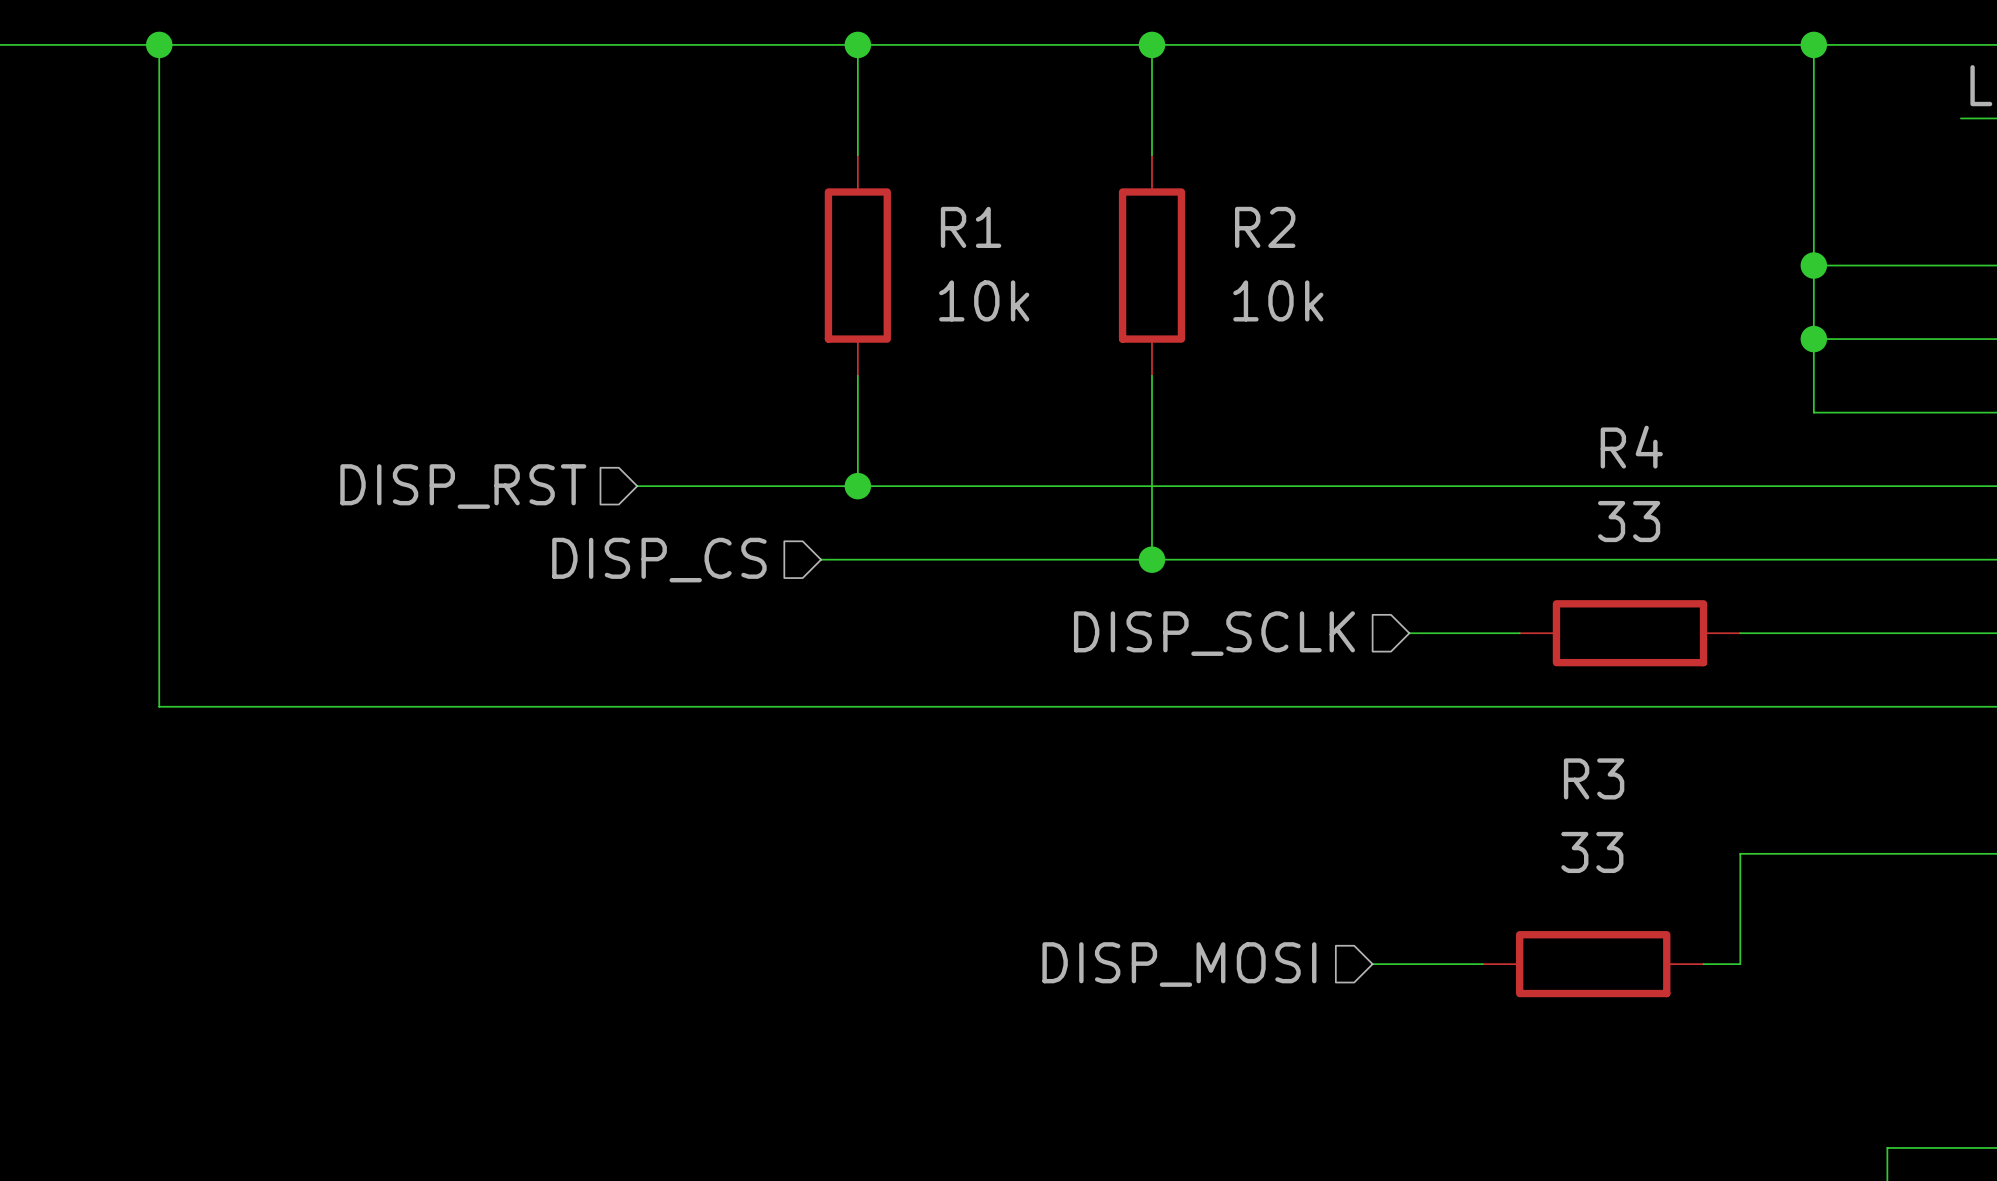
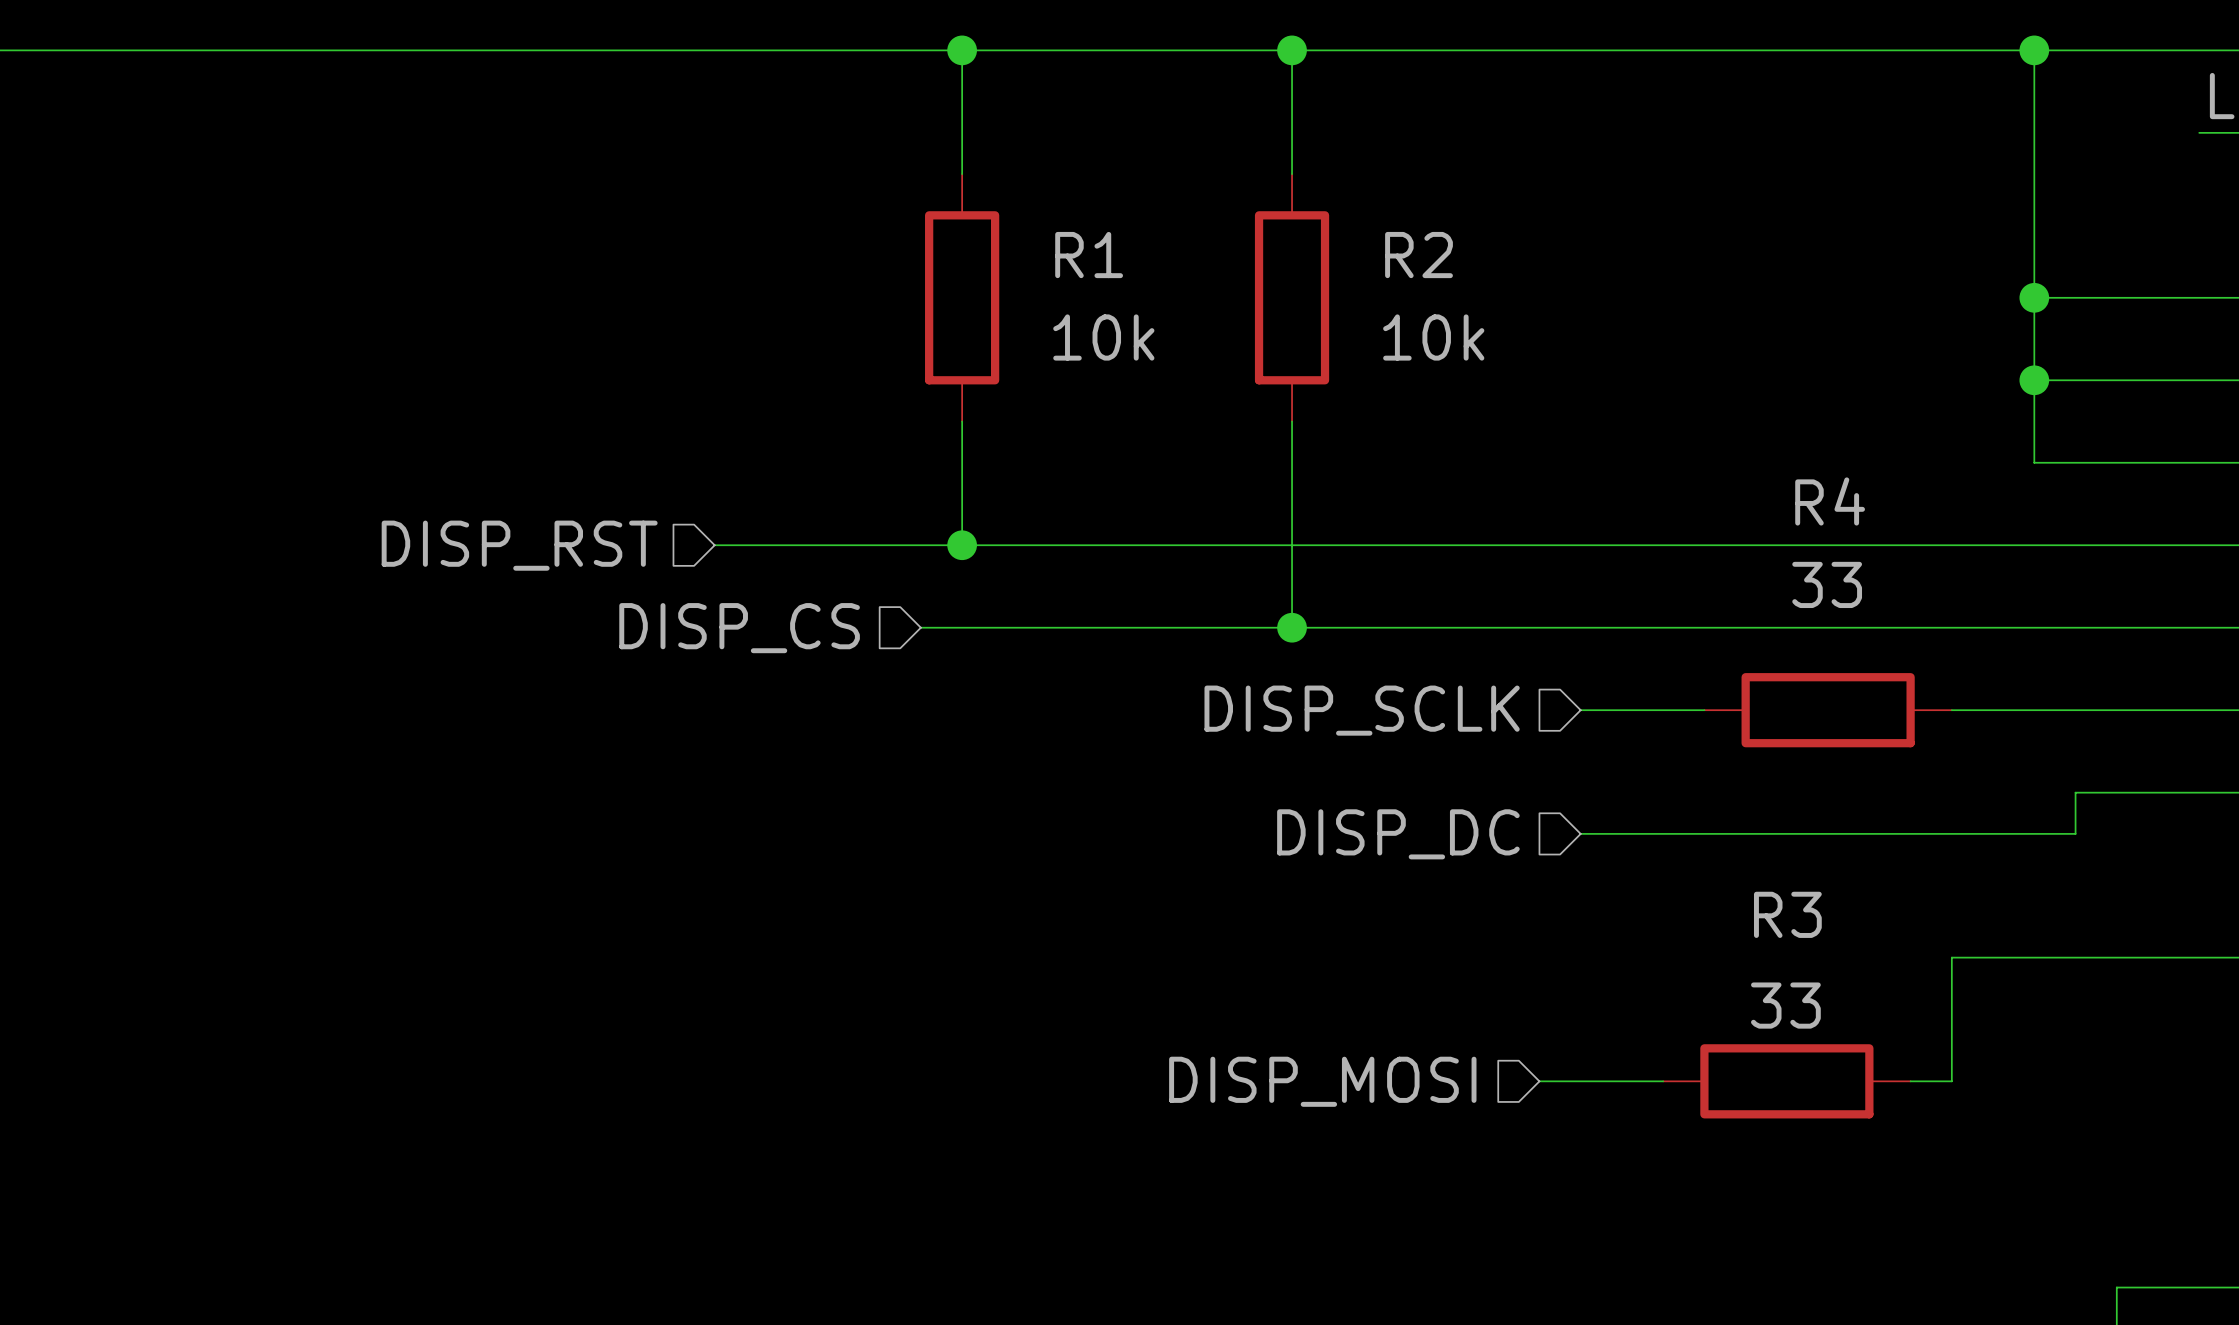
wire: (159, 44) (159, 706) (1850, 706) -> (1580, 833) (2075, 833) (2075, 792)
junction: (159, 44) -> none
hierarchical label: none -> DISP_DC (1398, 834)
R3 name position: R3 (1594, 778) -> R3 (1787, 914)
R3 value position: 33 (1592, 852) -> 33 (1785, 1005)

